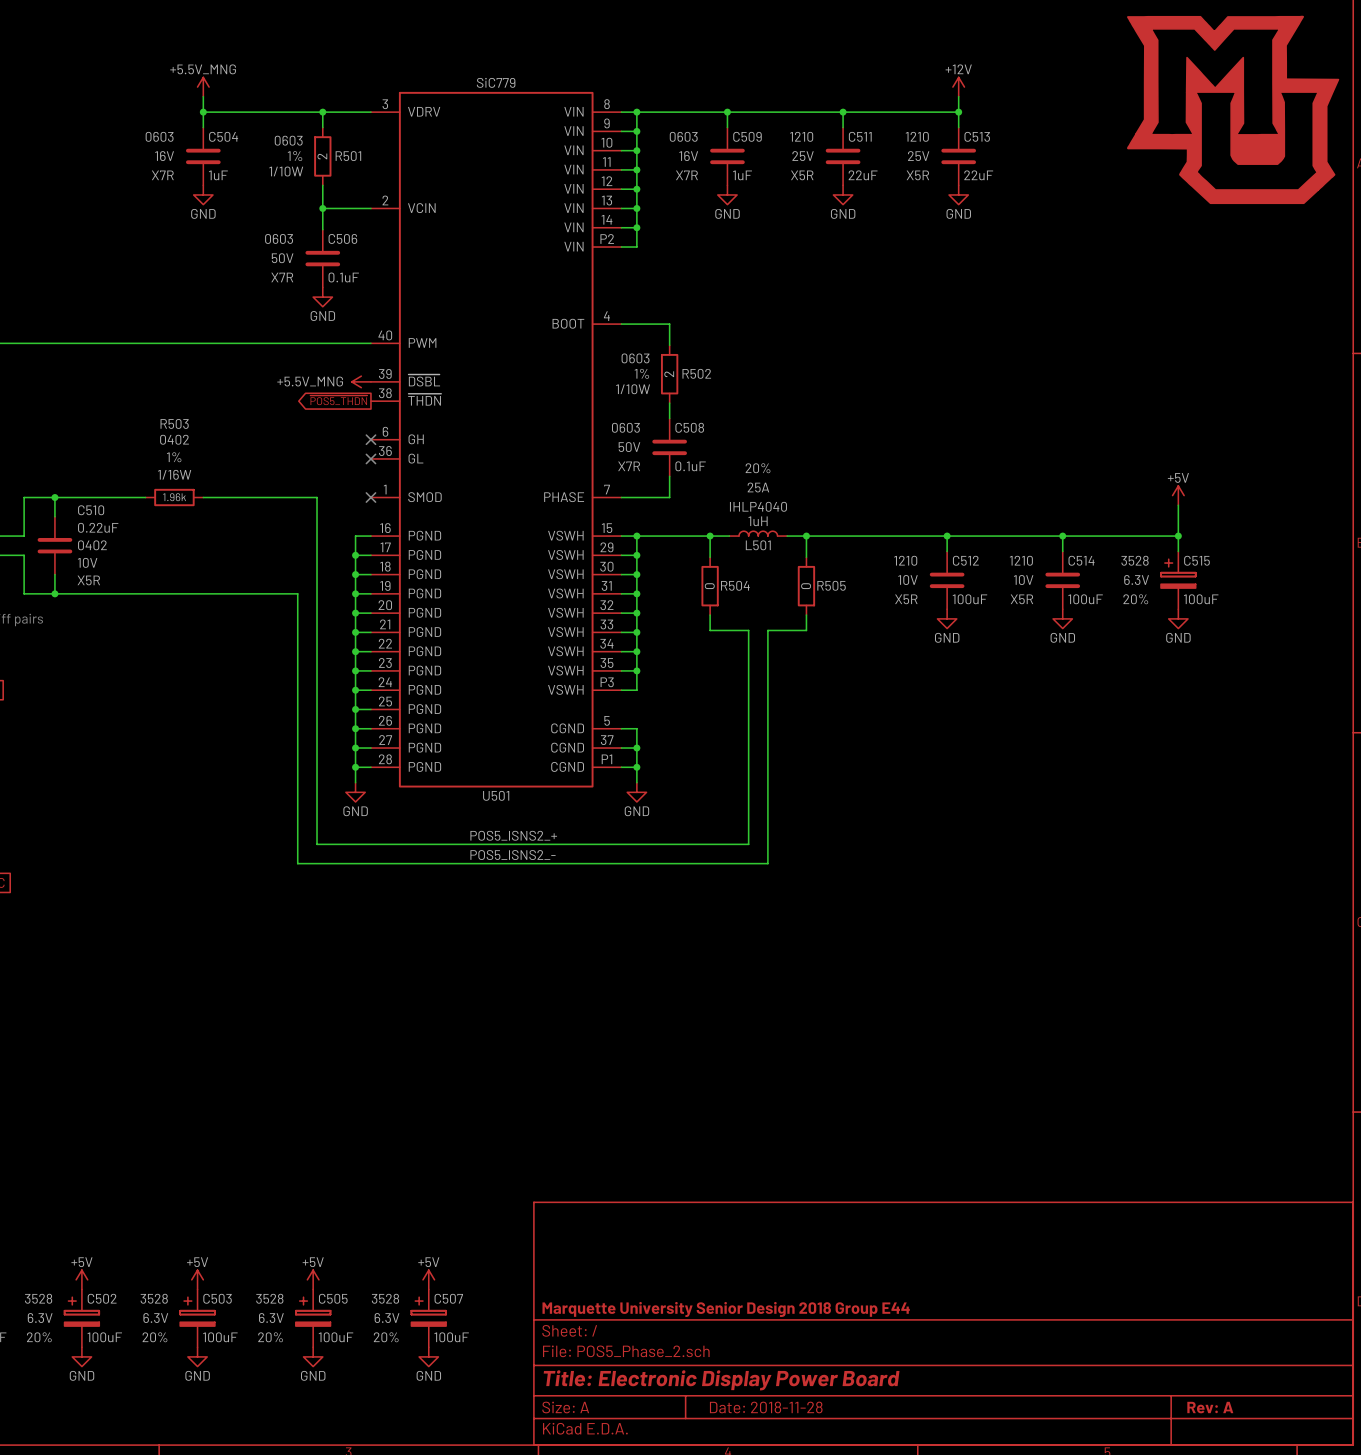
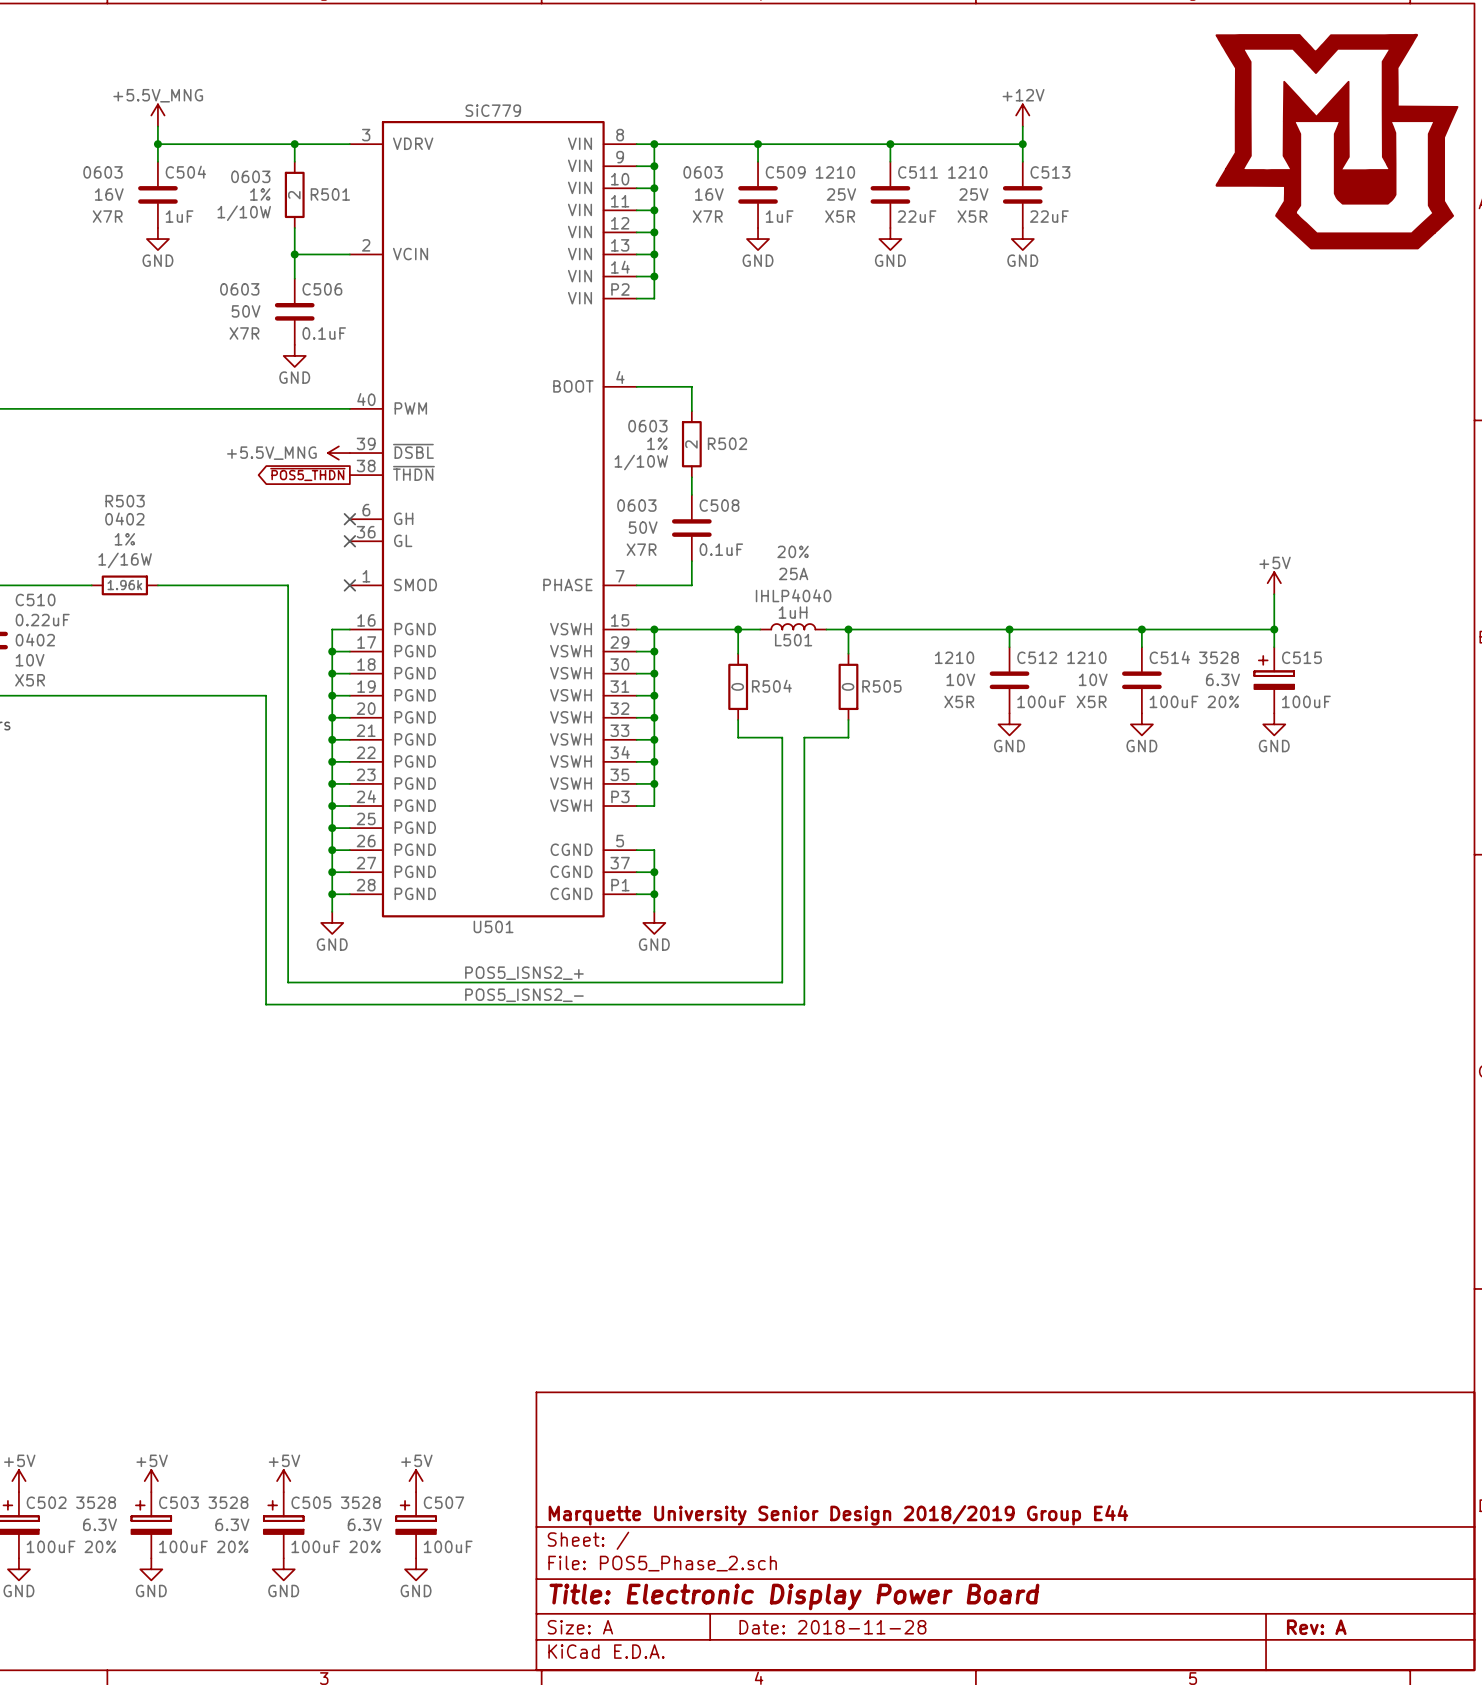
title block: Marquette University Senior Design 2018 Group E44 (726, 1309) -> Marquette University Senior Design 2018/2019 Group E44 (838, 1515)

